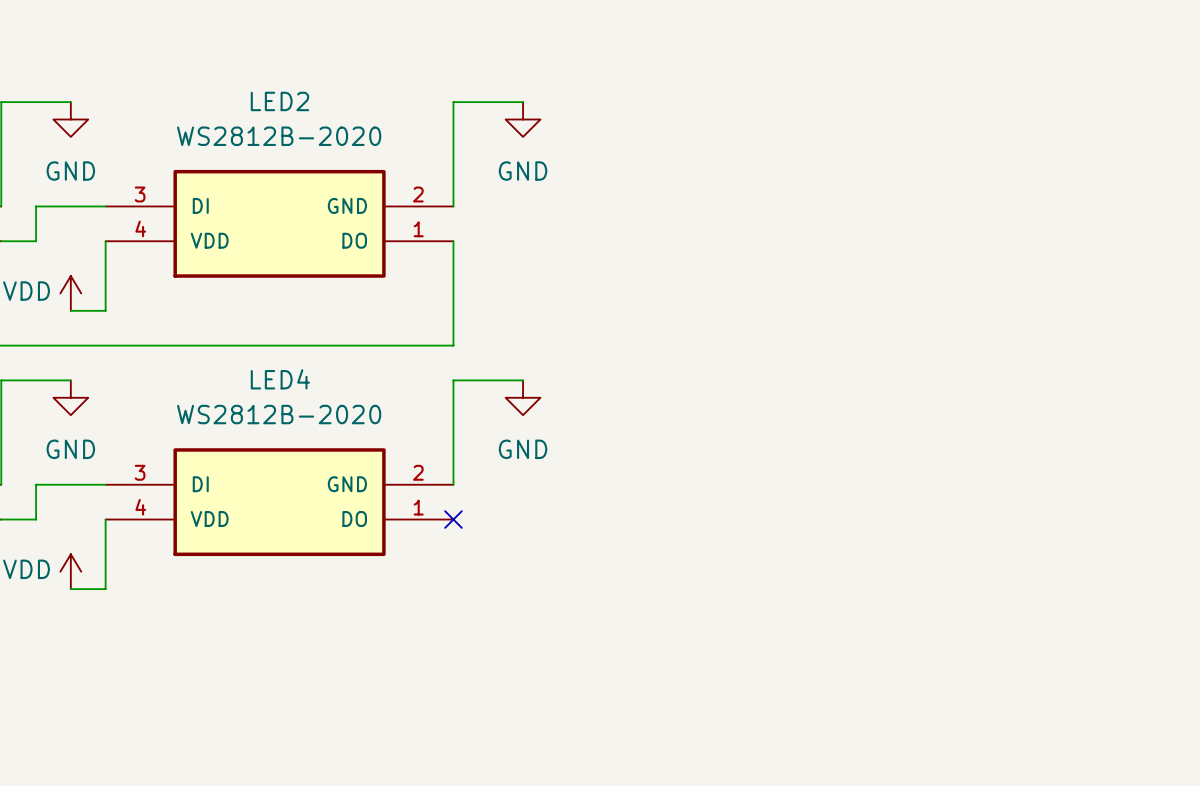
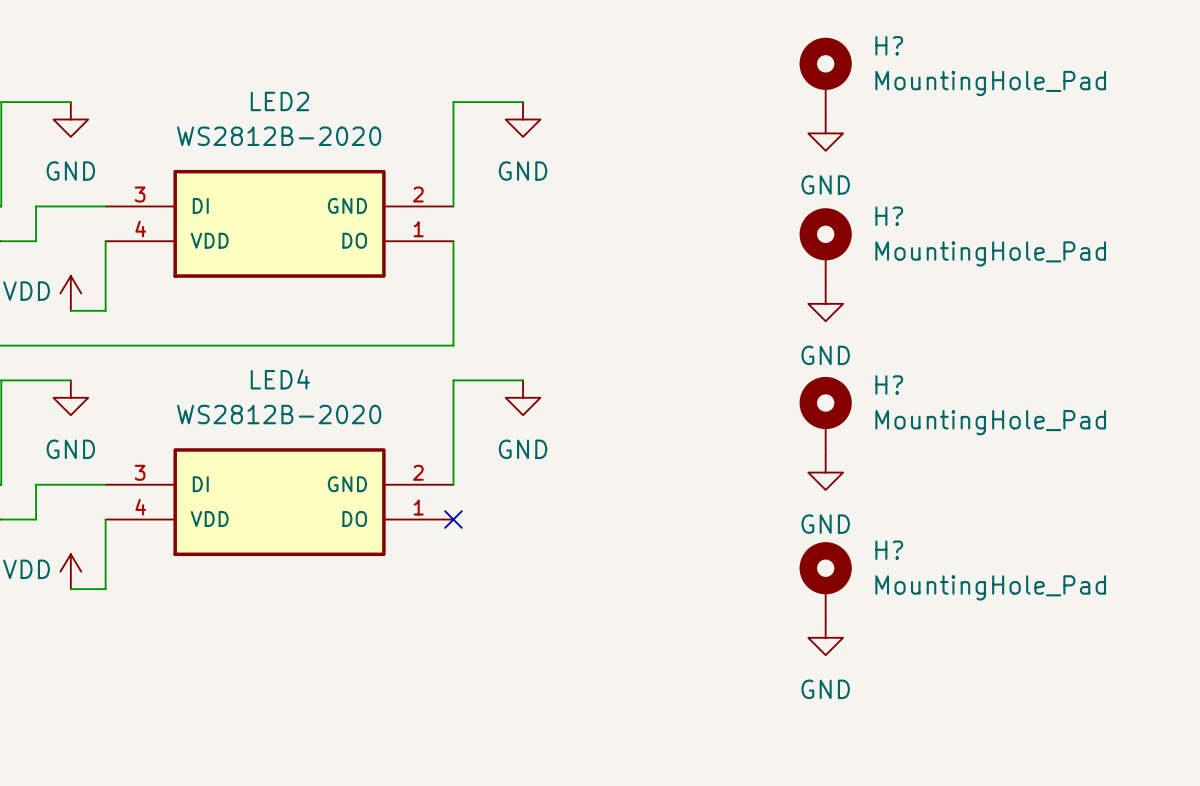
H?: none -> MountingHole_Pad (825, 76)
power symbol: none -> GND (825, 133)
H?: none -> MountingHole_Pad (825, 247)
power symbol: none -> GND (825, 303)
H?: none -> MountingHole_Pad (825, 416)
power symbol: none -> GND (825, 472)
H?: none -> MountingHole_Pad (825, 581)
power symbol: none -> GND (825, 637)

